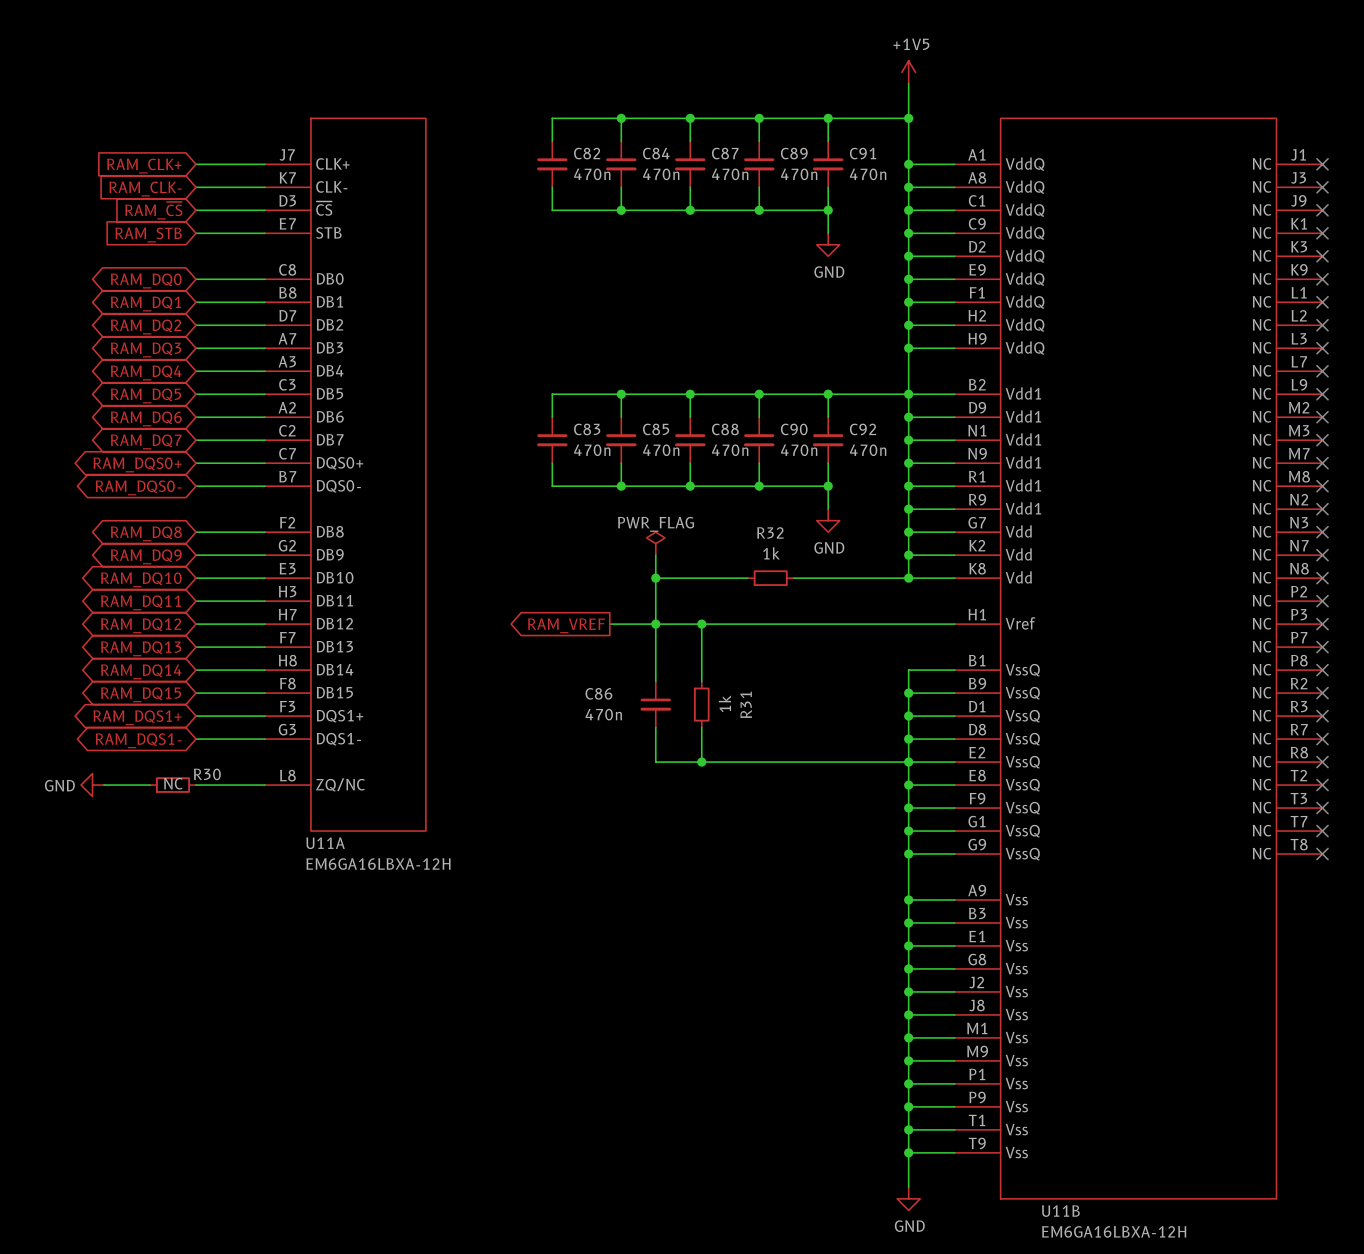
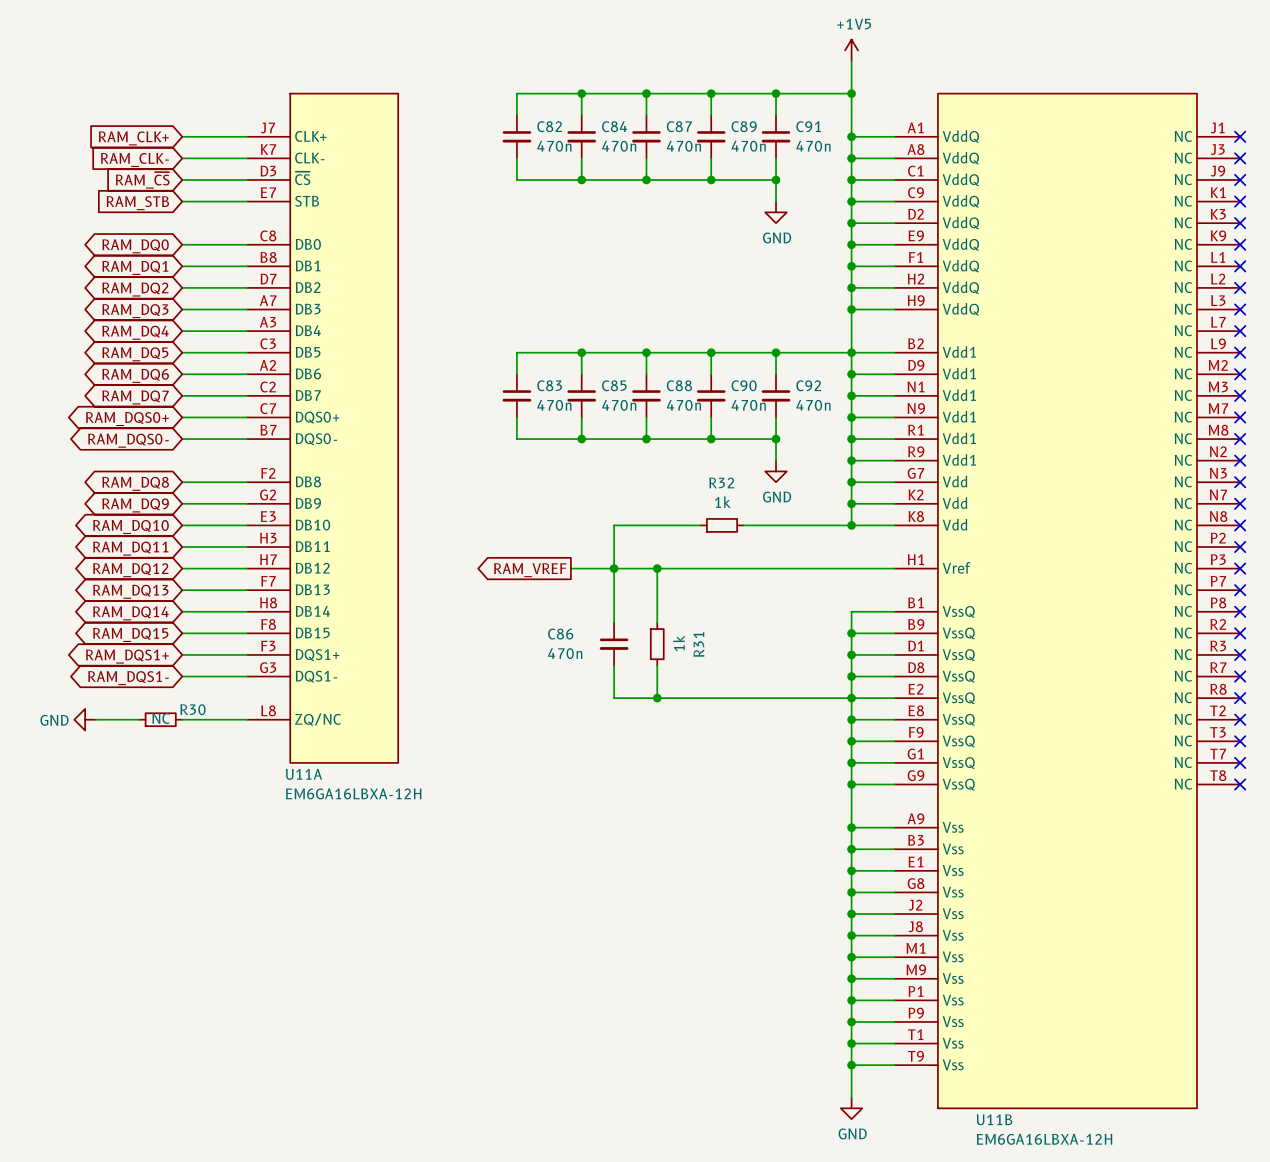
power symbol: PWR_FLAG (655, 543) -> none
wire: (655, 555) (655, 578) -> none
junction: (655, 578) -> none

